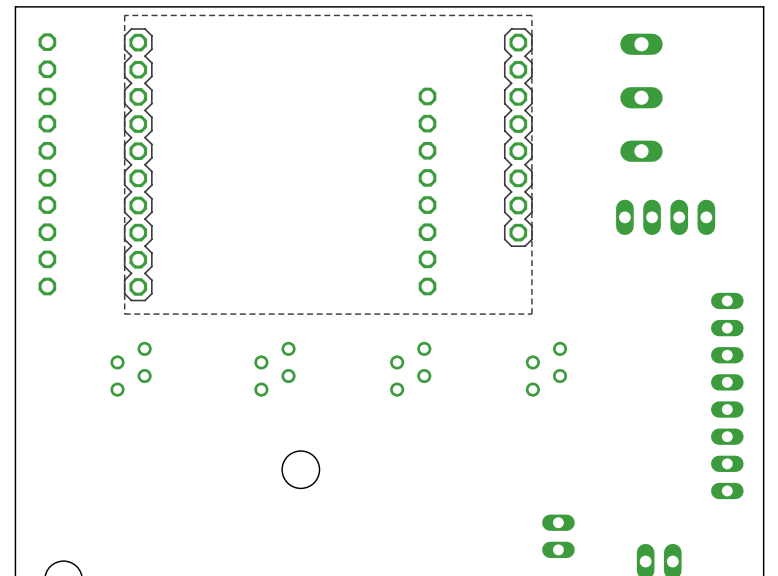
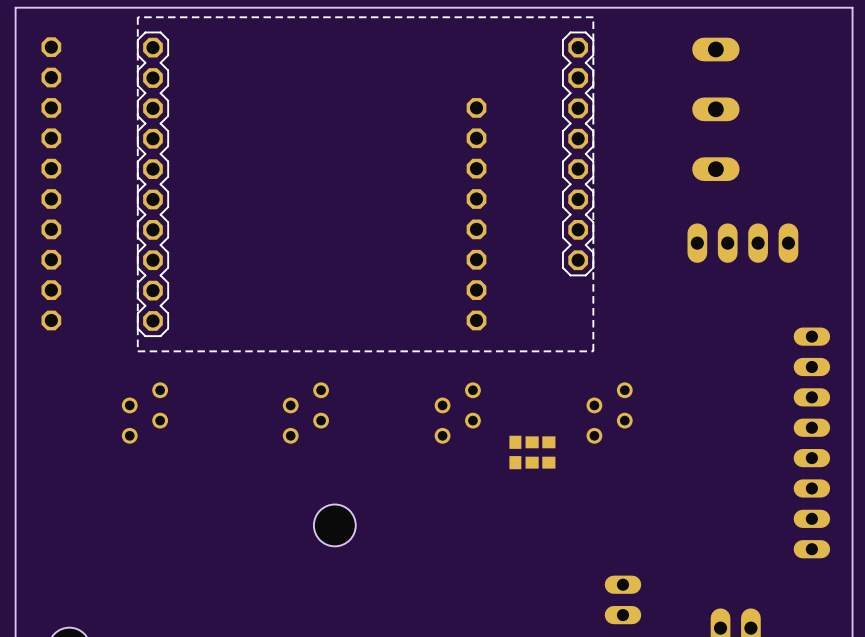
part: none -> (515, 452)
part: none -> (532, 452)
part: none -> (548, 452)

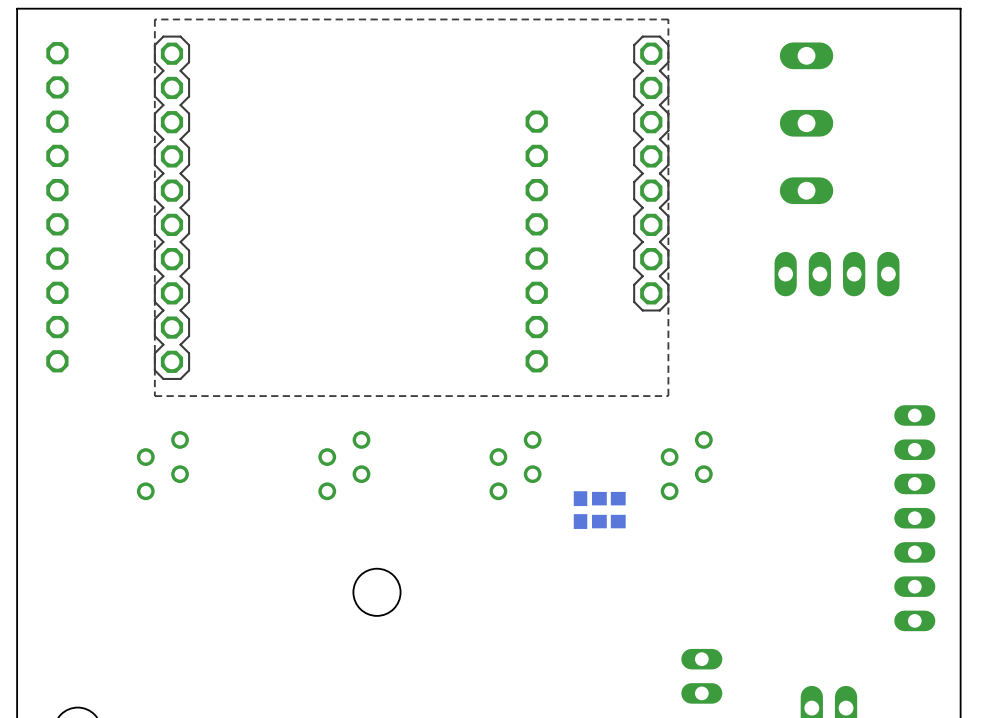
part: (811, 442) -> none
part: none -> (914, 518)

